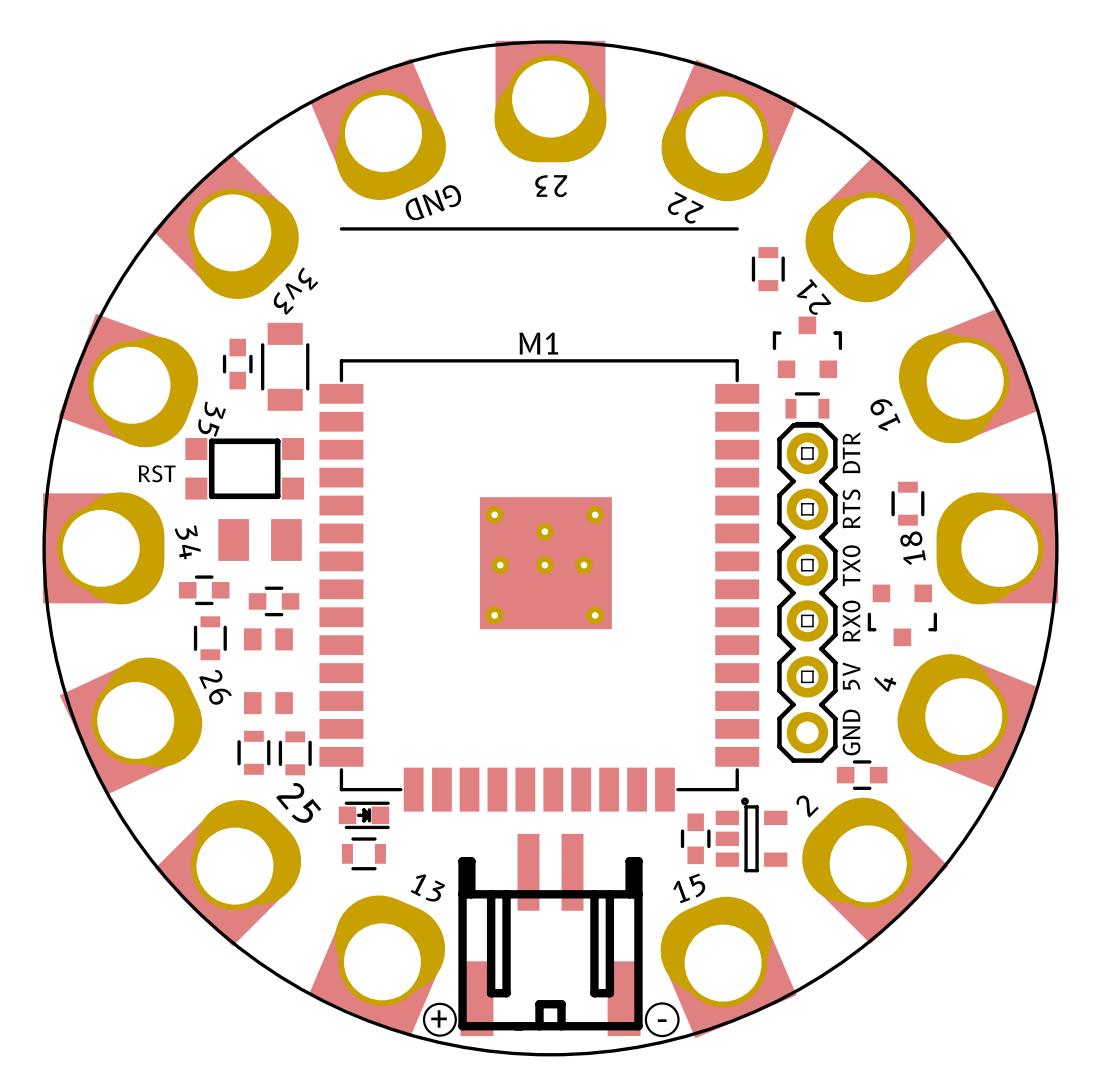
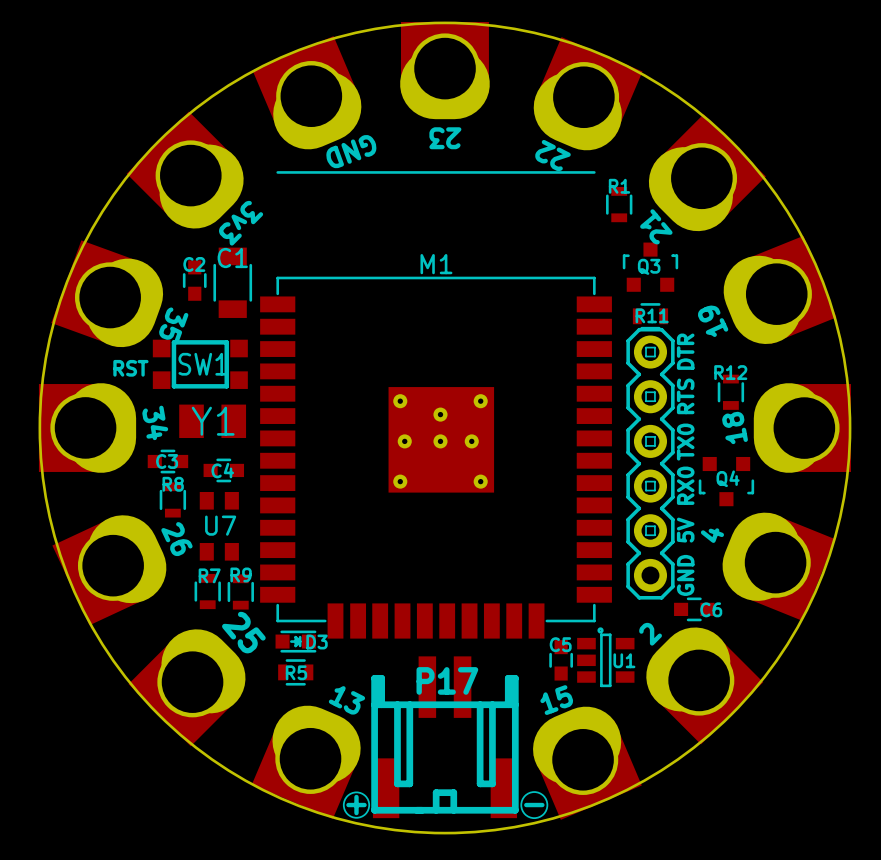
R1 name: none -> R1 (619, 186)
C1 name: none -> C1 (232, 258)
C2 name: none -> C2 (194, 264)
Q3 name: none -> Q3 (649, 266)
R11 name: none -> R11 (652, 315)
SW1 name: none -> SW1 (203, 364)
R12 name: none -> R12 (730, 372)
Y1 name: none -> Y1 (213, 421)
C3 name: none -> C3 (167, 461)
C4 name: none -> C4 (222, 470)
Q4 name: none -> Q4 (728, 478)
R8 name: none -> R8 (173, 484)
U7 name: none -> U7 (220, 525)
R9 name: none -> R9 (241, 574)
R7 name: none -> R7 (209, 575)
C6 name: none -> C6 (711, 609)
D3 name: none -> D3 (317, 642)
C5 name: none -> C5 (560, 644)
U1 name: none -> U1 (624, 660)
R5 name: none -> R5 (296, 672)
P17 name: none -> P17 (447, 680)

